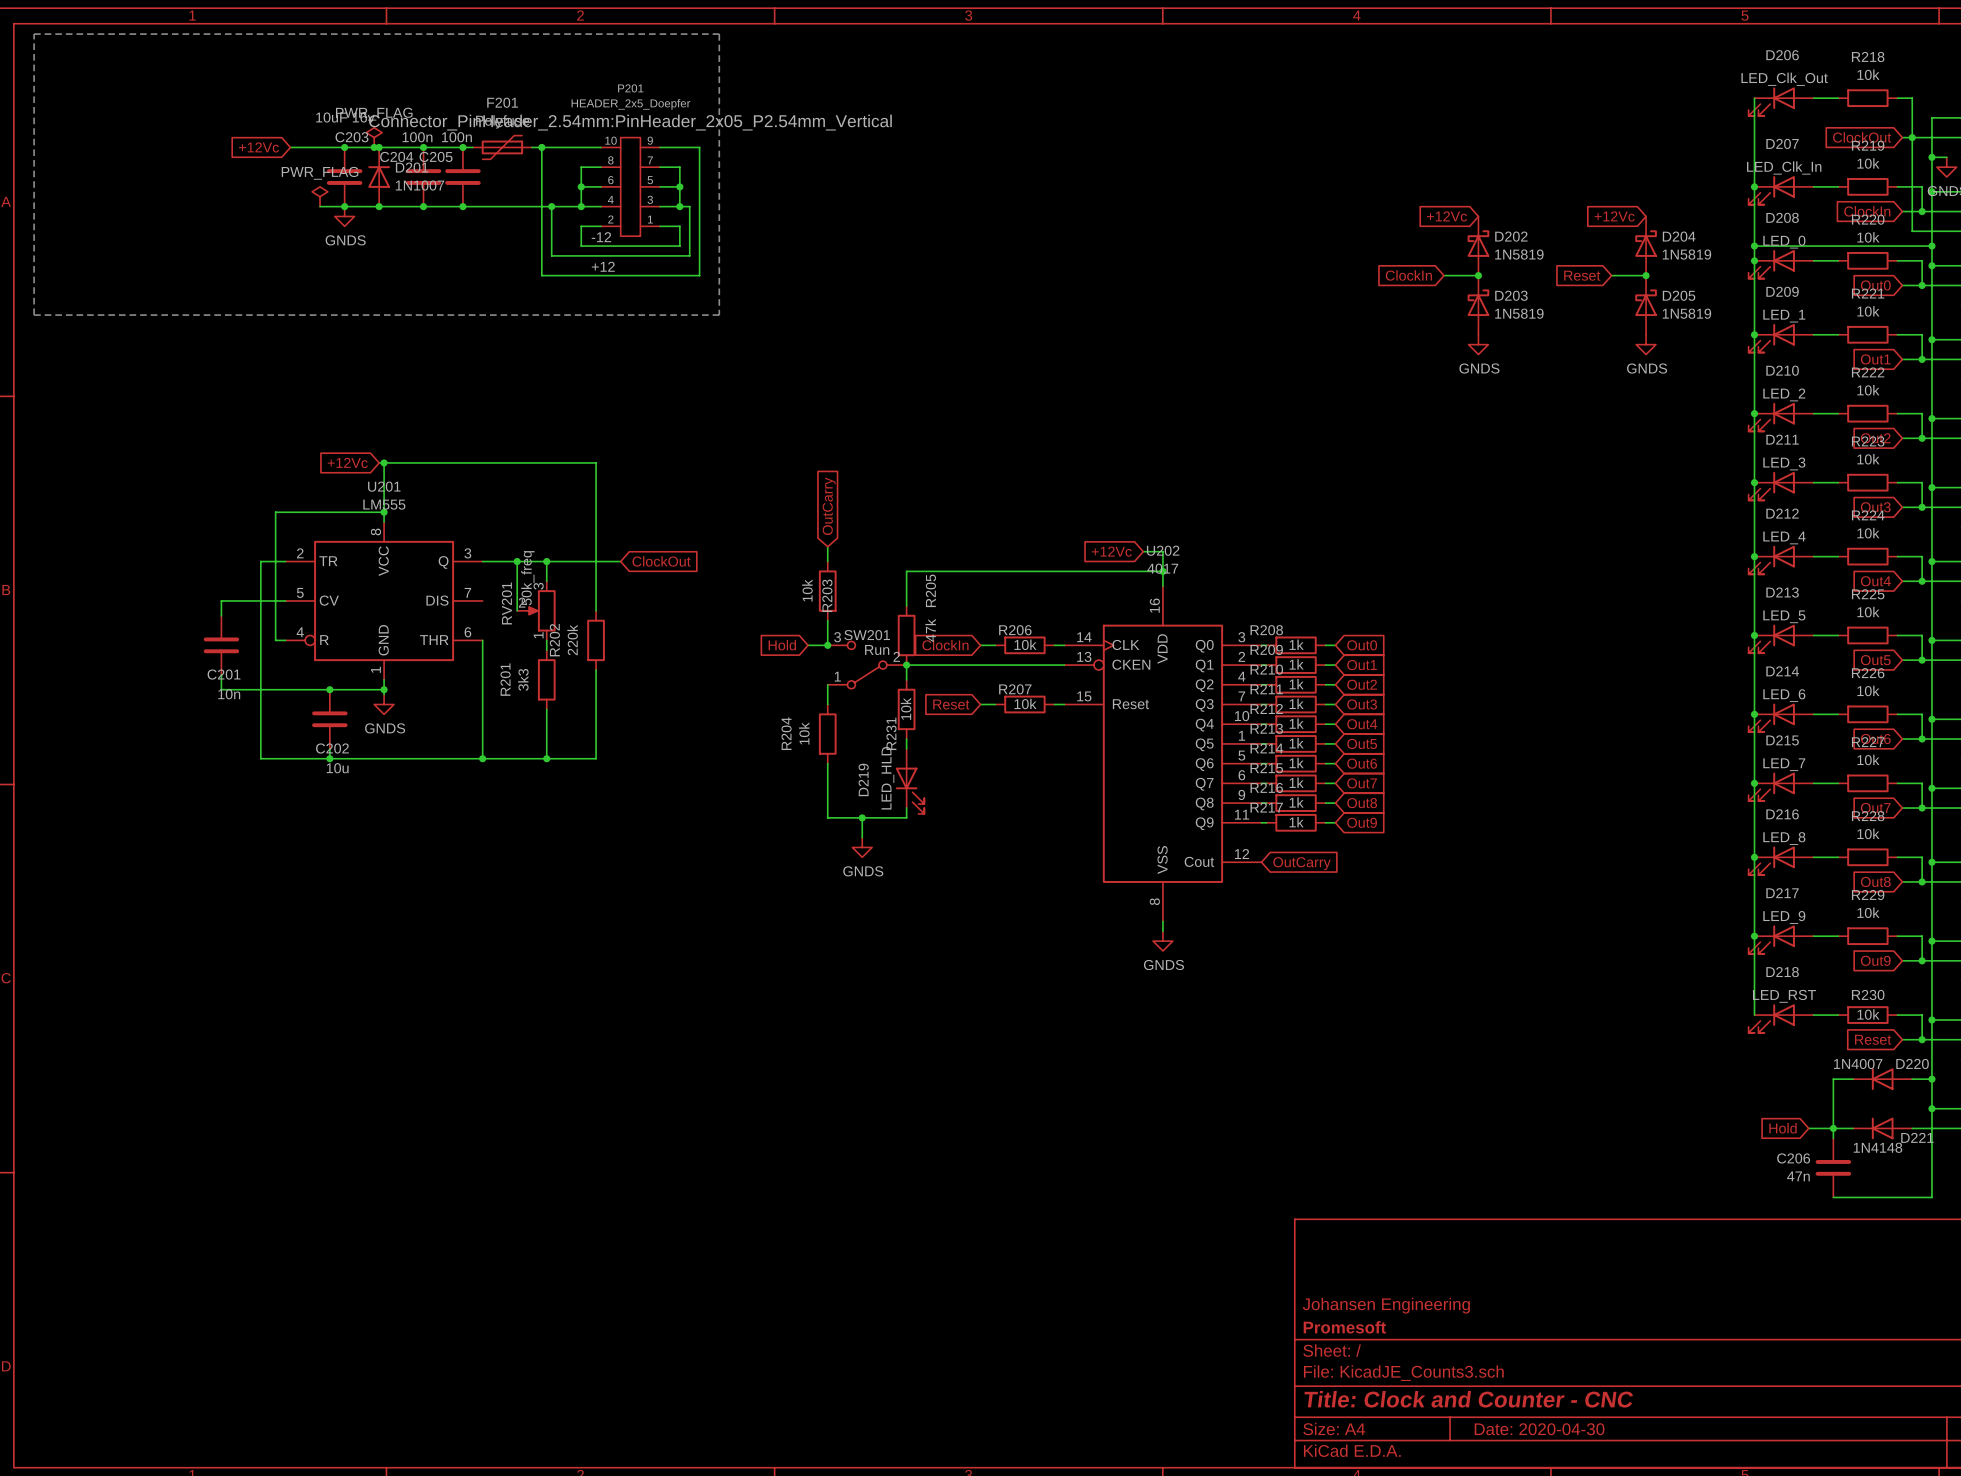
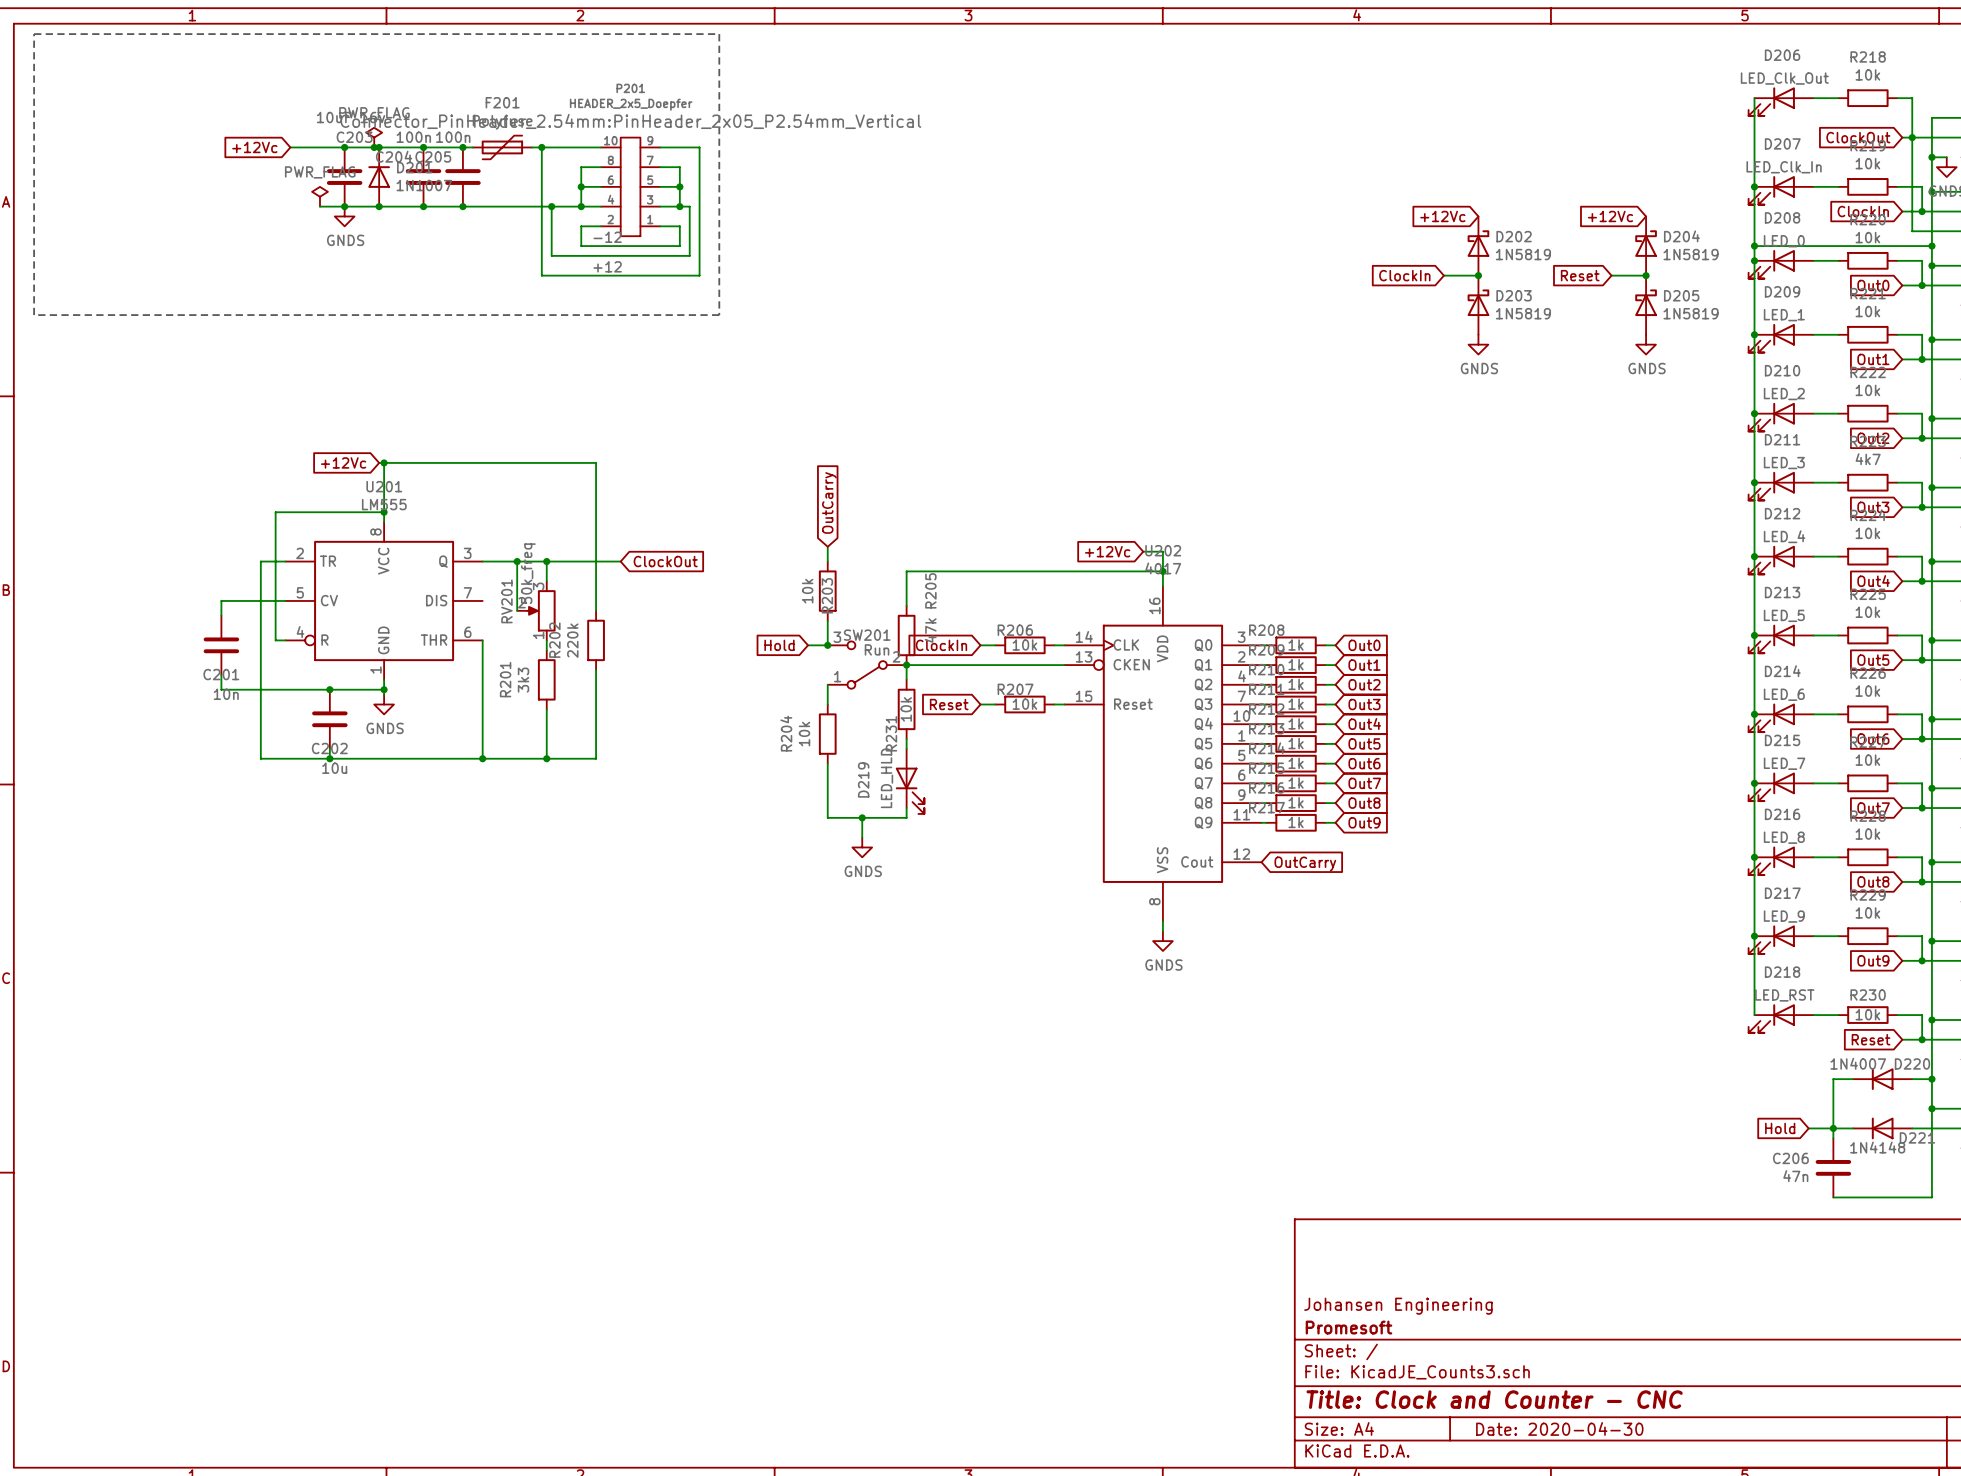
R223 value: 10k (1868, 459) -> 4k7 (1868, 459)

